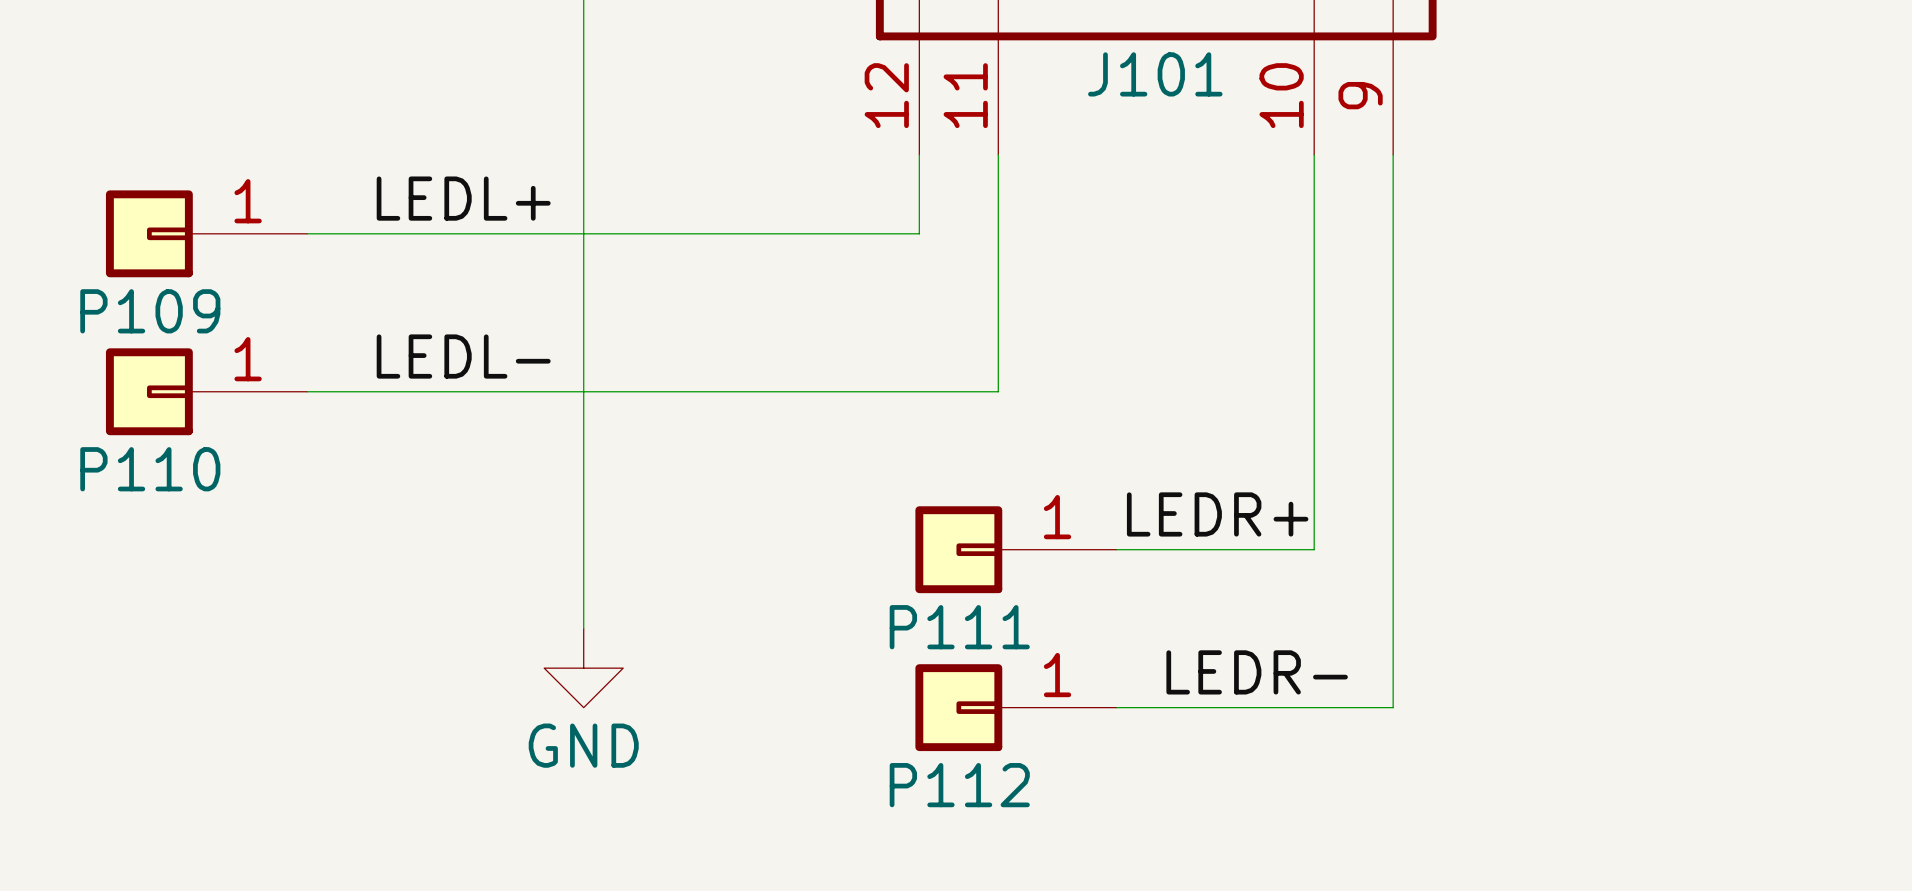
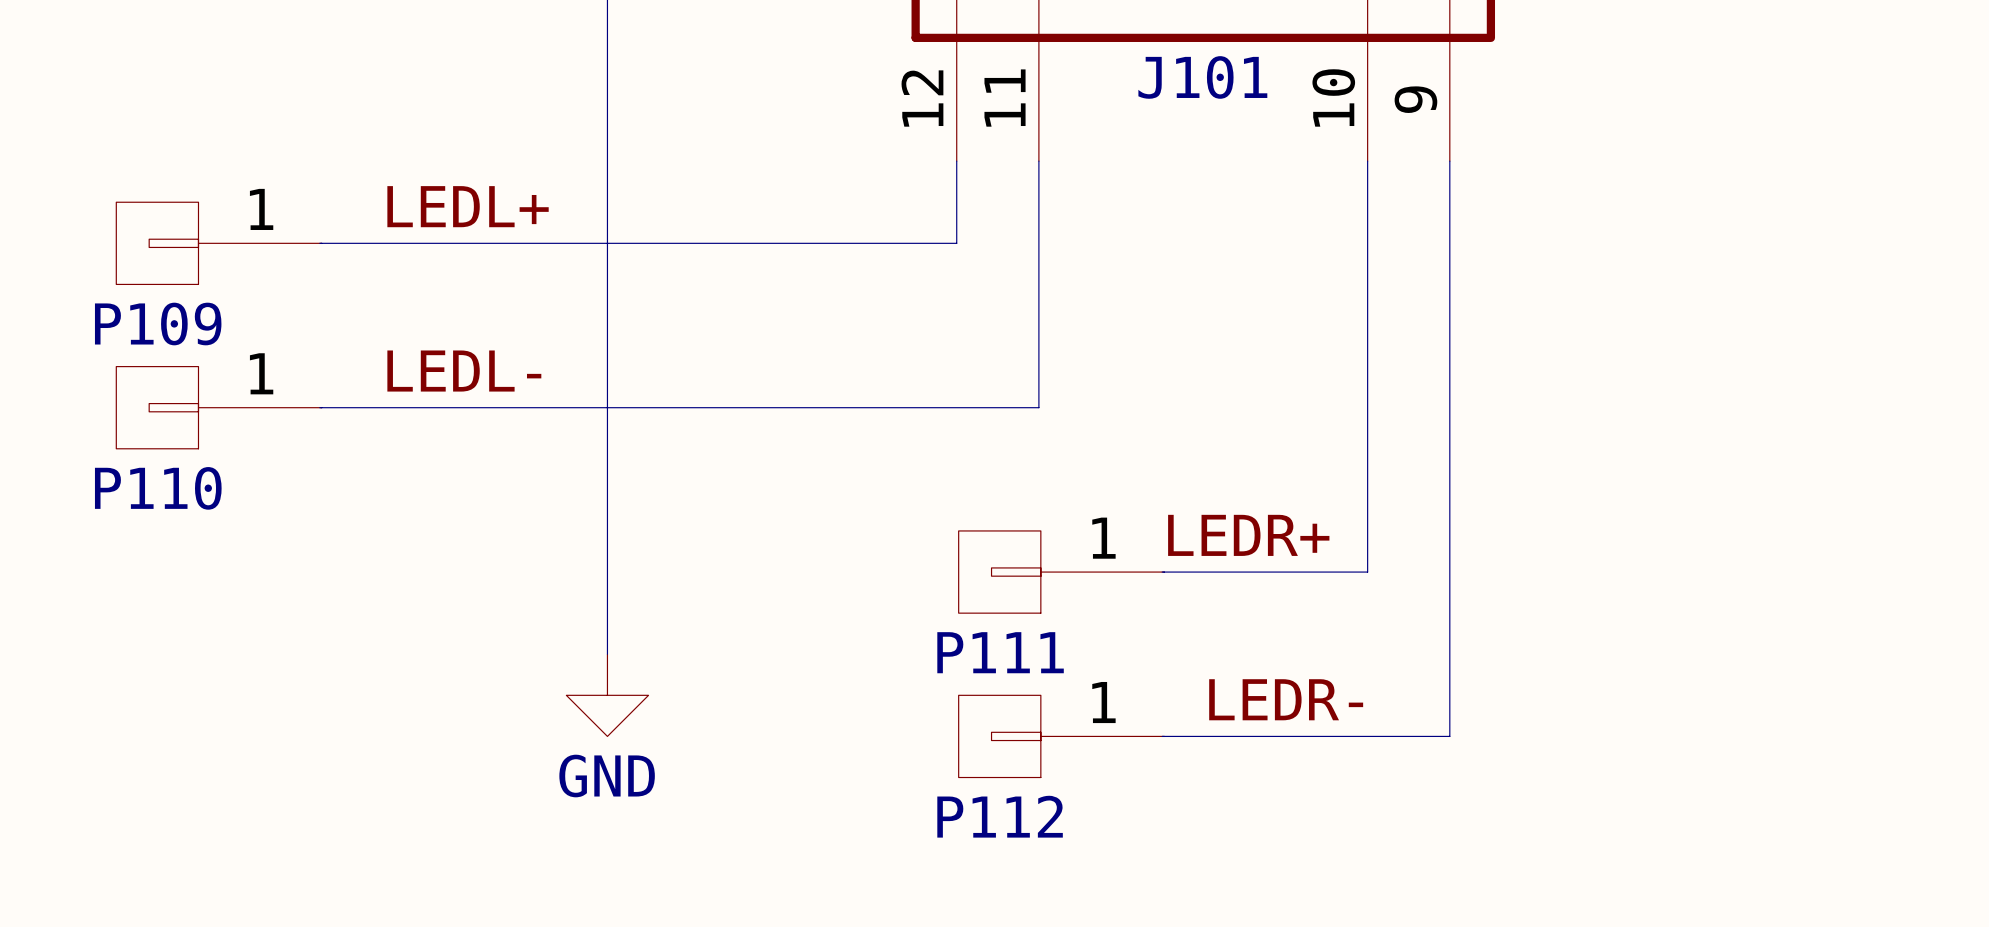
P109 symbol: [105, 190, 308, 278] -> [116, 202, 322, 285]
P110 symbol: [105, 348, 308, 436] -> [116, 366, 322, 449]
P111 symbol: [915, 506, 1117, 594] -> [958, 530, 1165, 614]
P112 symbol: [915, 664, 1117, 752] -> [958, 695, 1165, 778]

